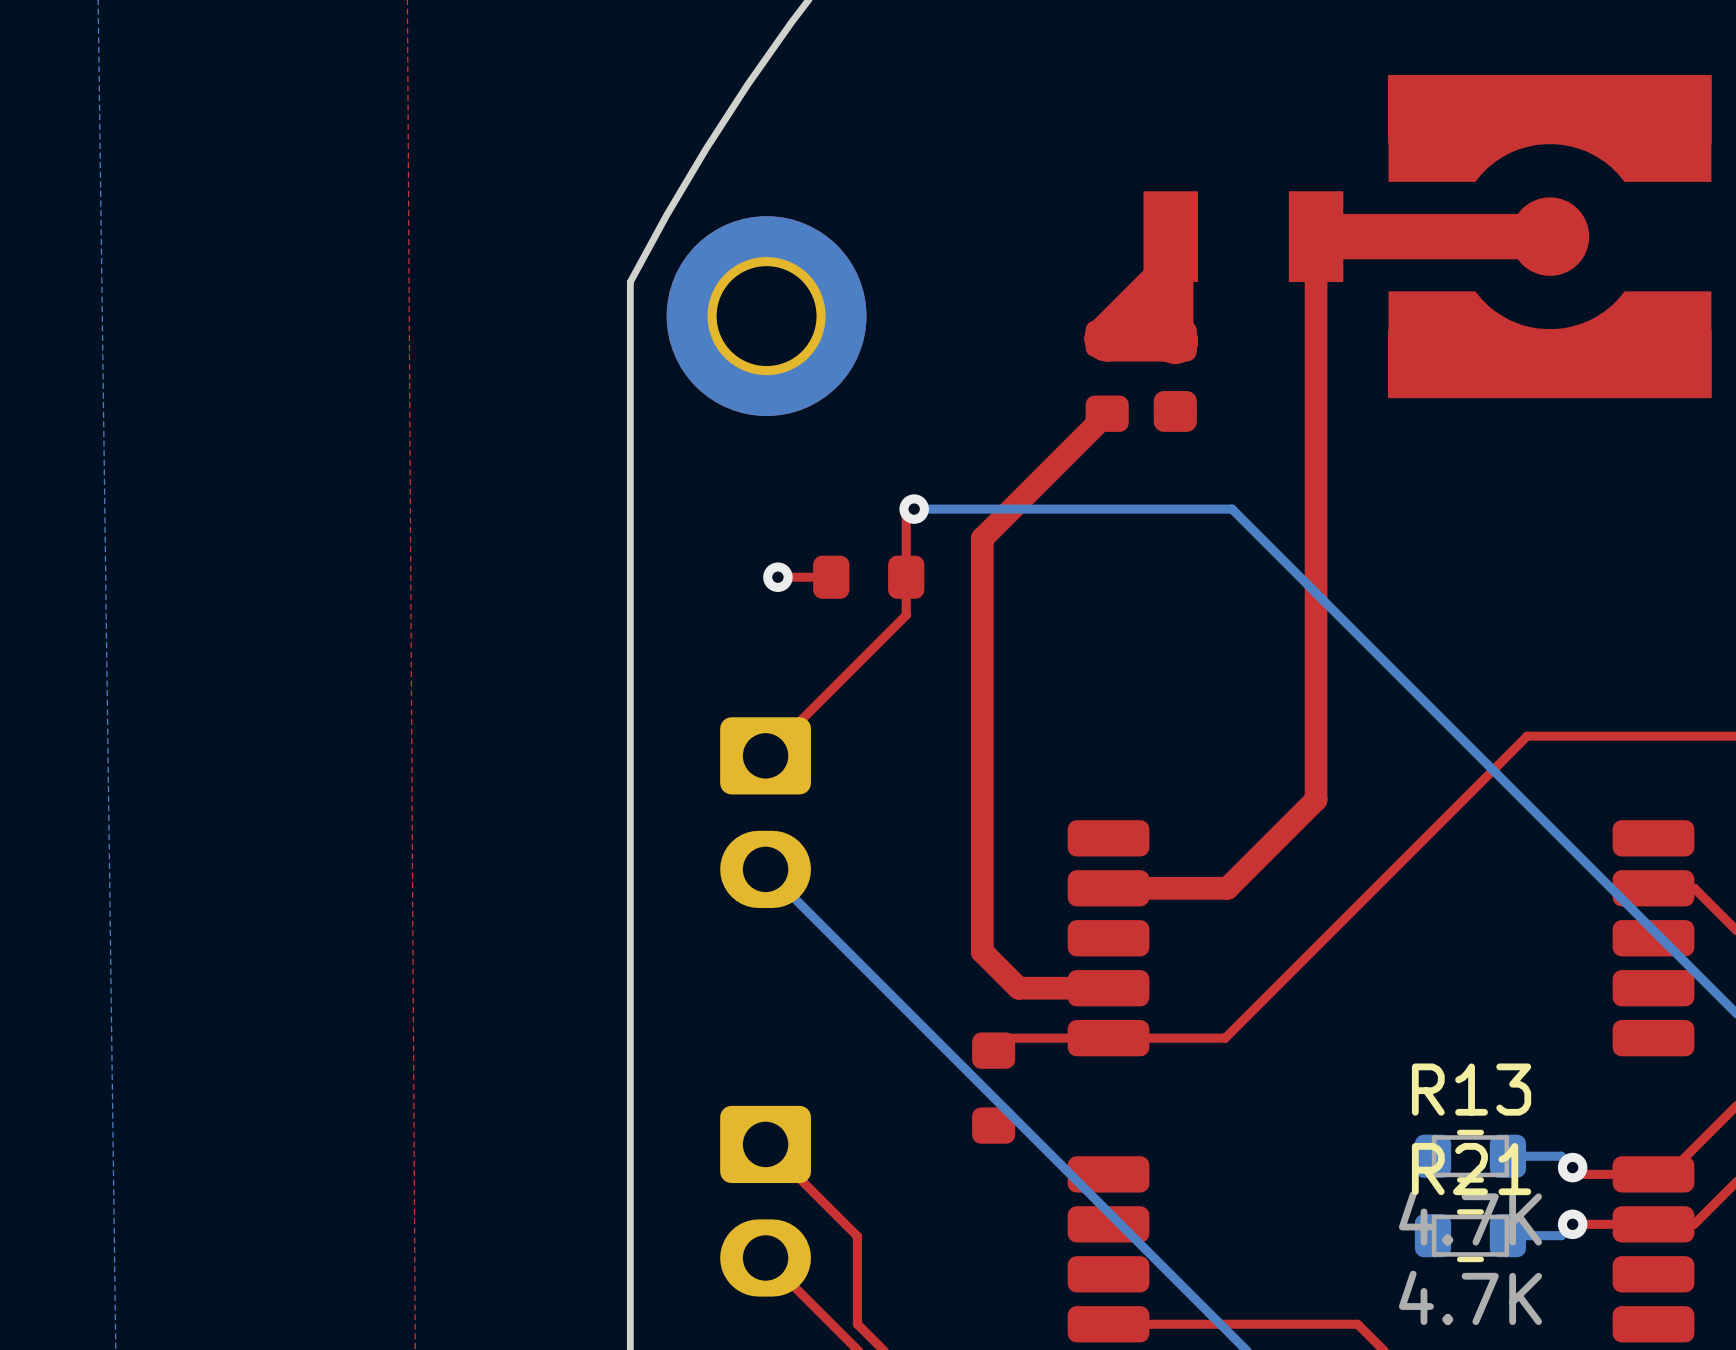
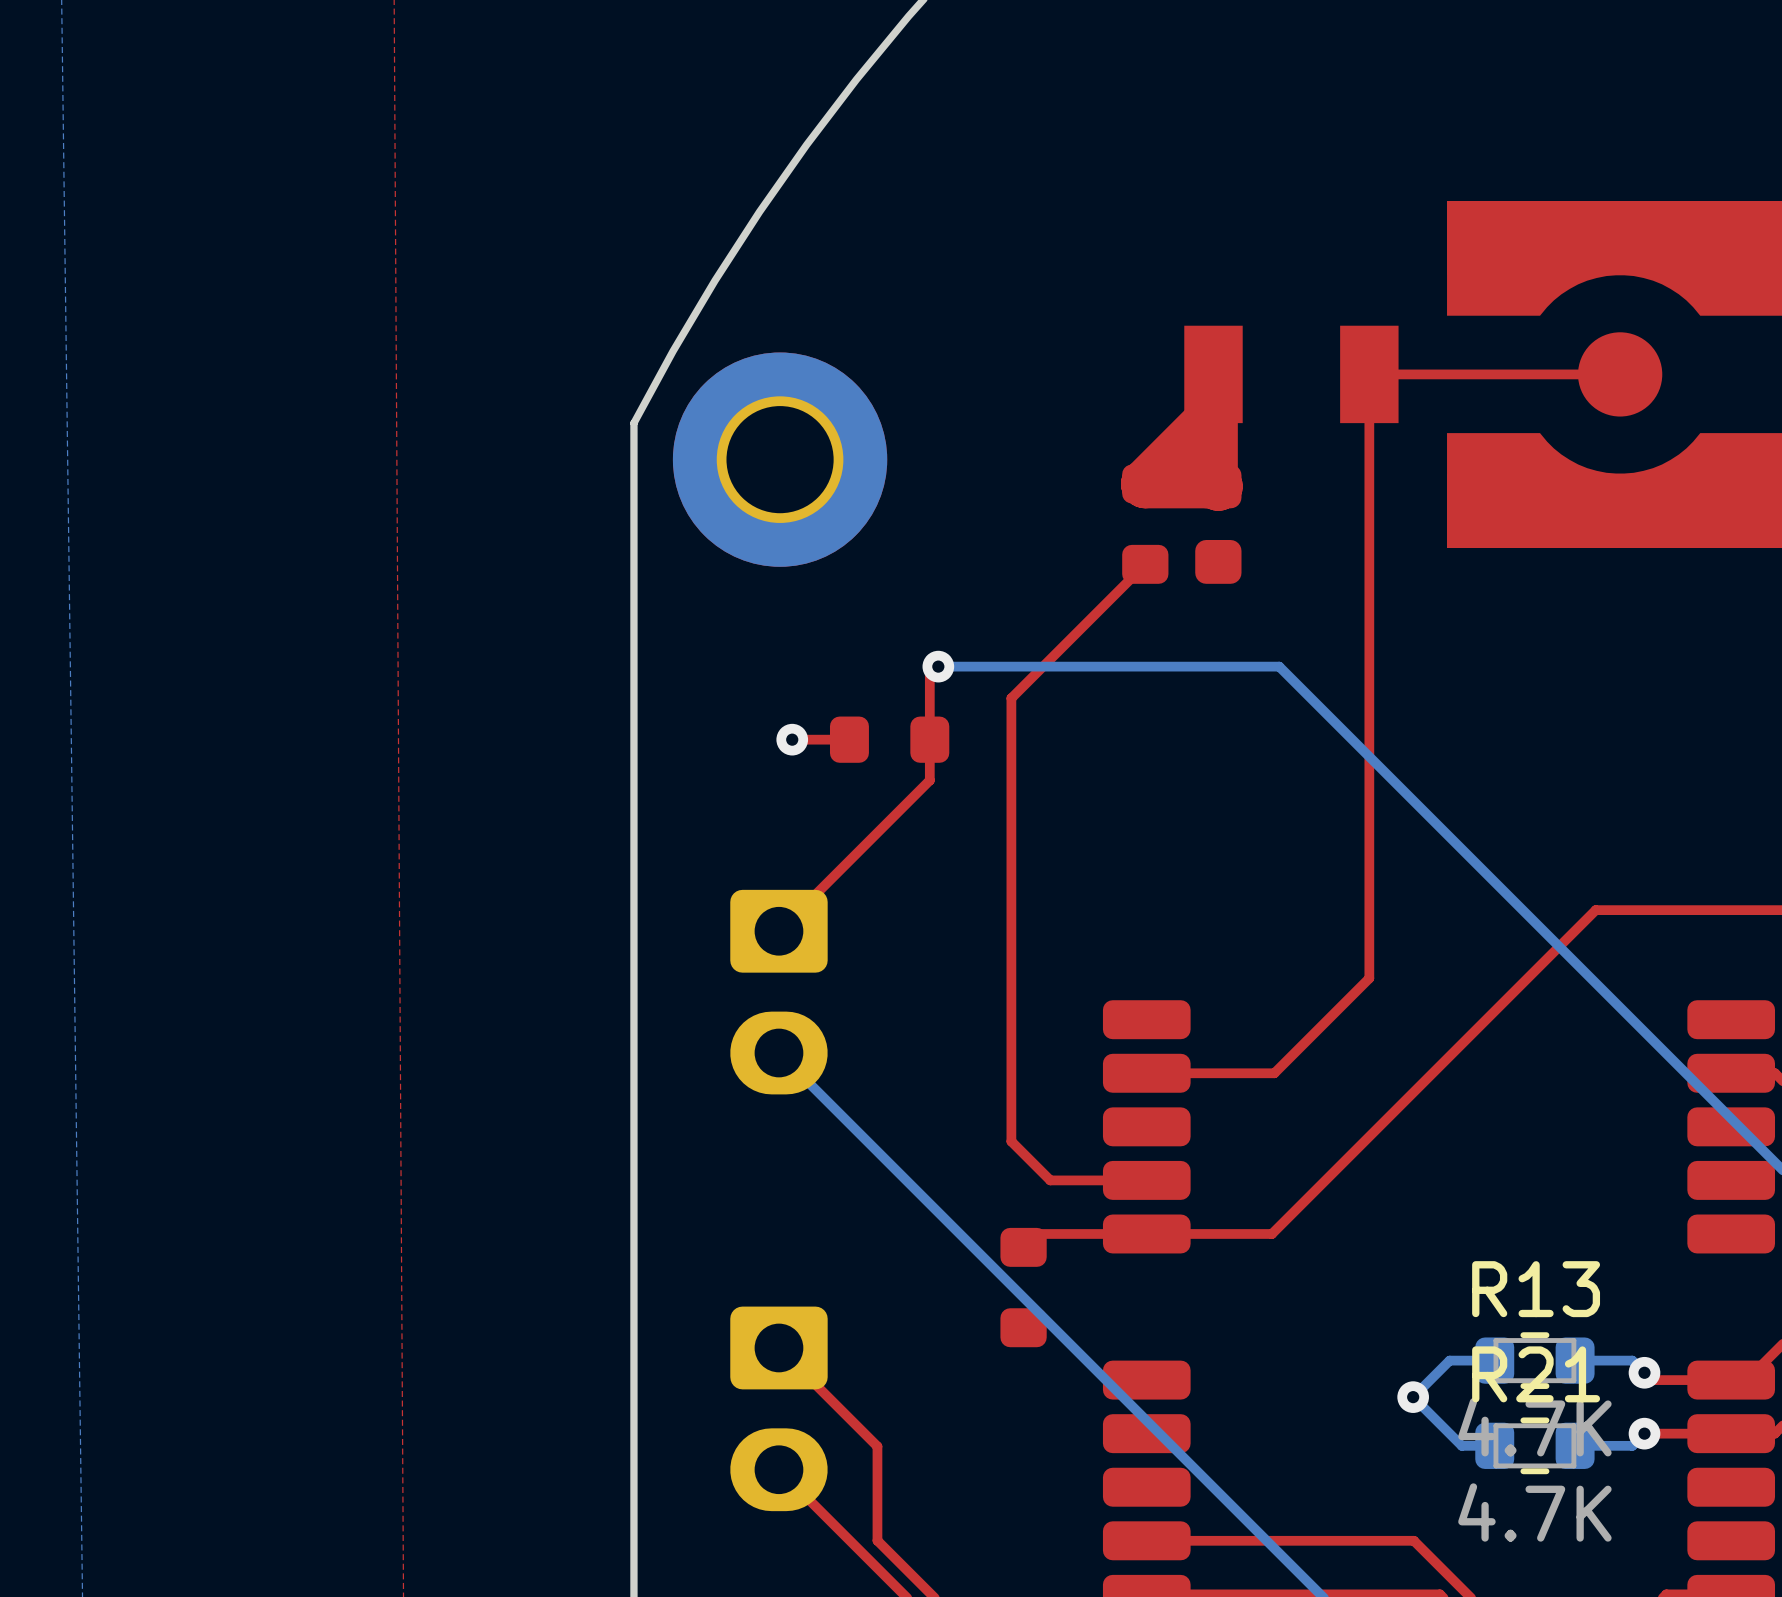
top track width: thick (1549, 236) (1316, 236) (1316, 799) (1227, 888) (1108, 888) -> thin (1620, 374) (1369, 374) (1369, 978) (1274, 1073) (1146, 1073)
top track width: thick (1107, 413) (982, 538) (982, 951) (1018, 988) (1108, 988) -> thin (1145, 564) (1011, 698) (1011, 1141) (1050, 1180) (1146, 1180)
bottom track: none -> (1494, 1360) (1449, 1360) (1413, 1397) (1461, 1445) (1494, 1445)
via: none -> (1413, 1397)

